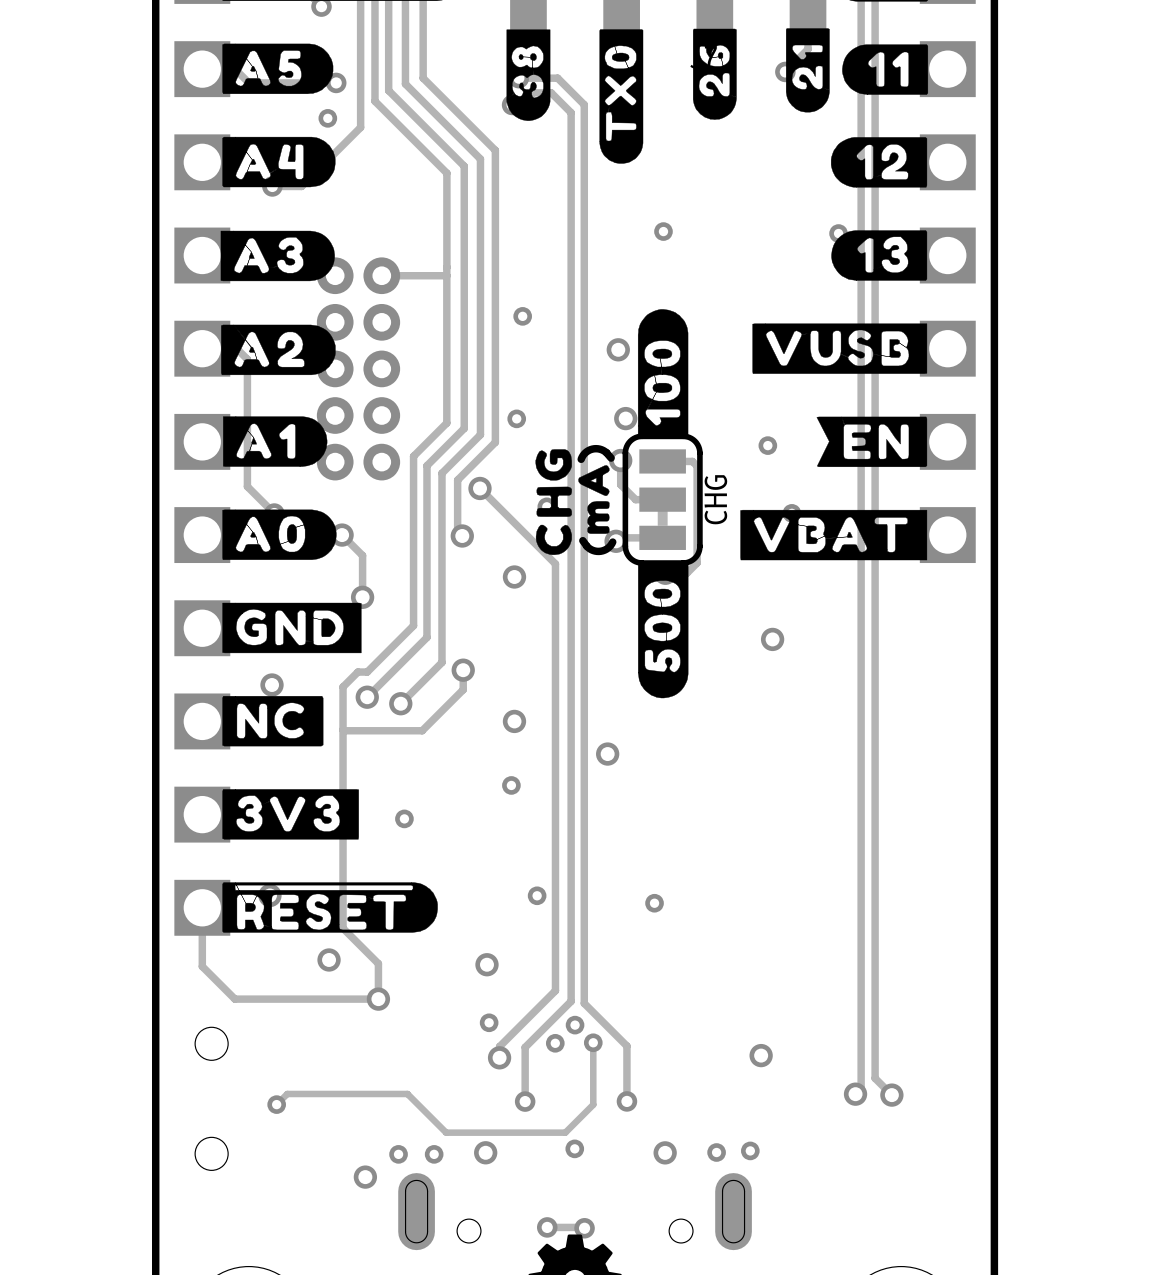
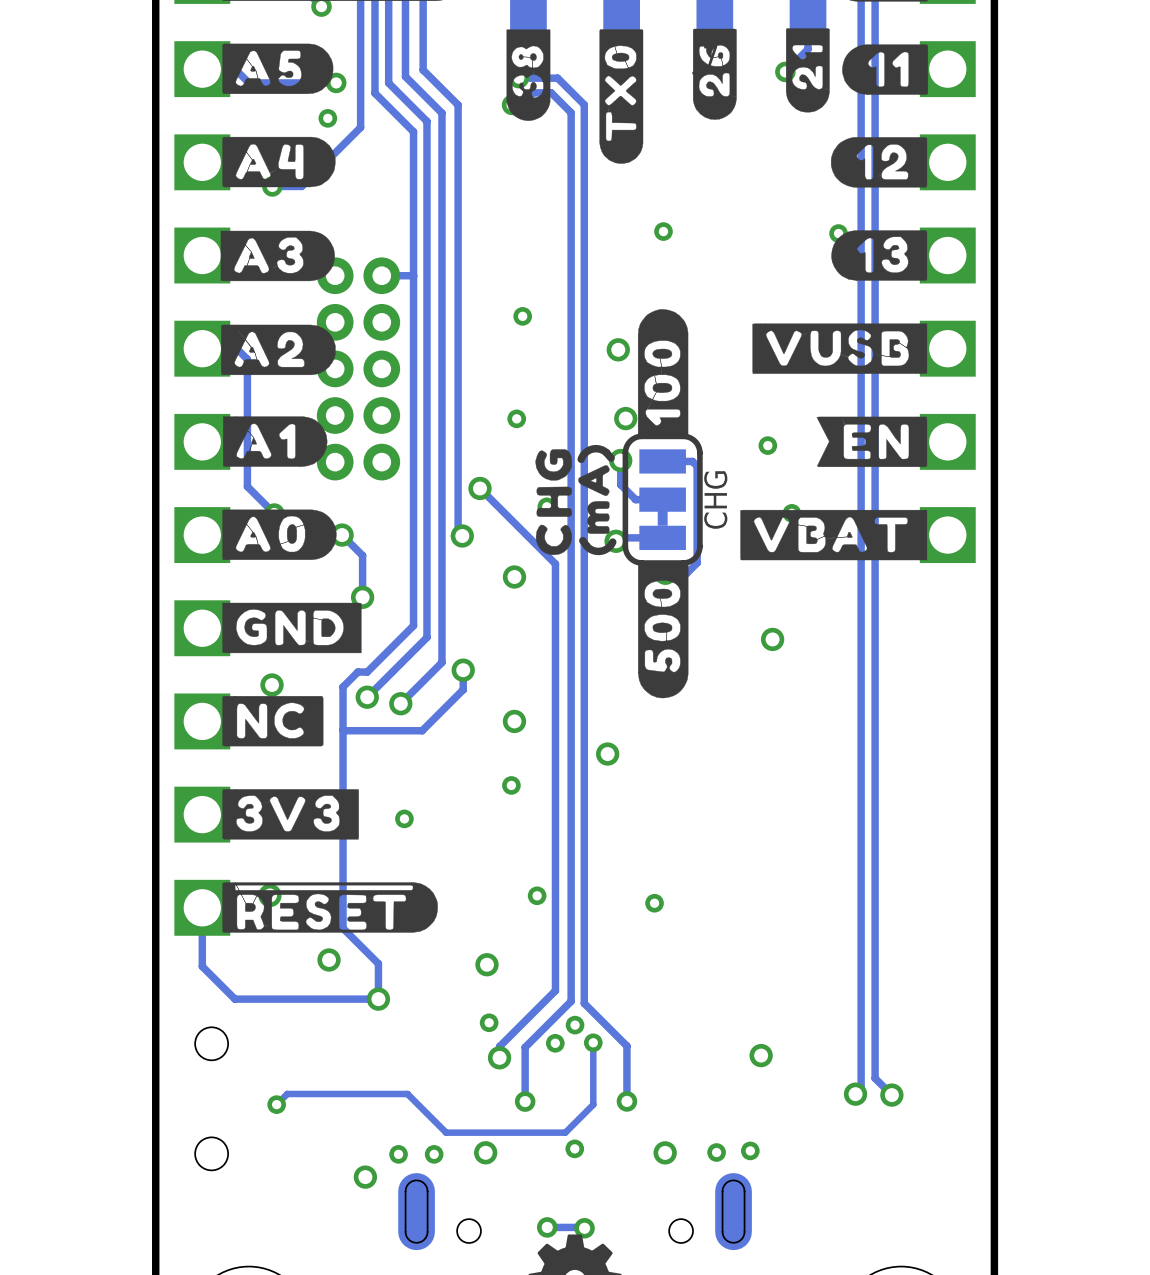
track: (423, 70) (423, 78) (495, 150) (495, 442) (457, 480) (457, 531) -> (423, 70) (458, 105) (458, 531)
track: (405, 76) (405, 84) (480, 159) (480, 434) (441, 473) -> (405, 76) (441, 113) (441, 473)
track: (388, 83) (388, 90) (464, 166) (464, 428) (426, 465) -> (388, 83) (426, 121) (426, 465)
track: (374, 93) (374, 101) (446, 173) (446, 267) -> none
track: (446, 267) (446, 423) (413, 456) -> (374, 93) (413, 131) (413, 456)
track: (446, 275) (413, 275) -> none

